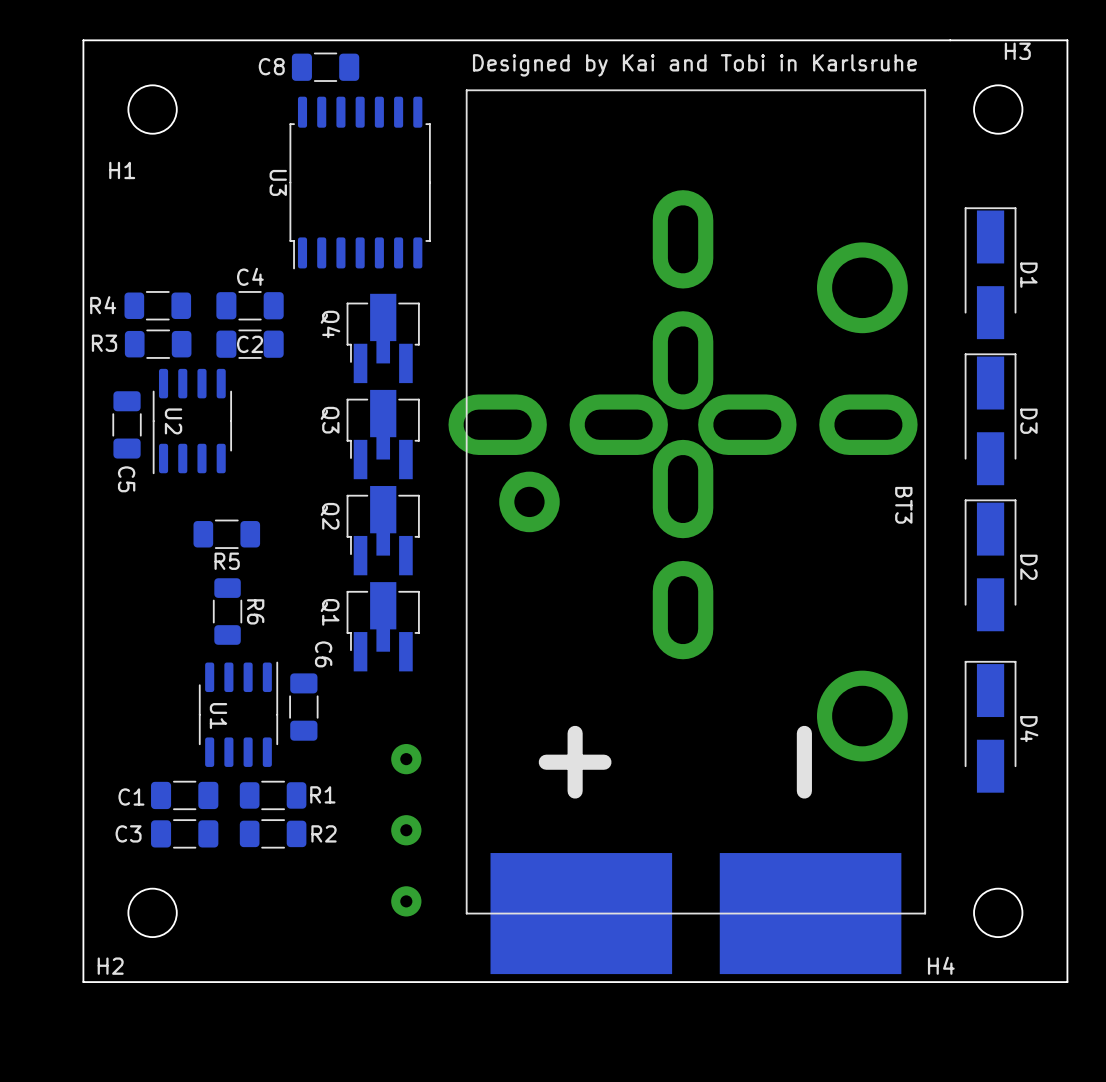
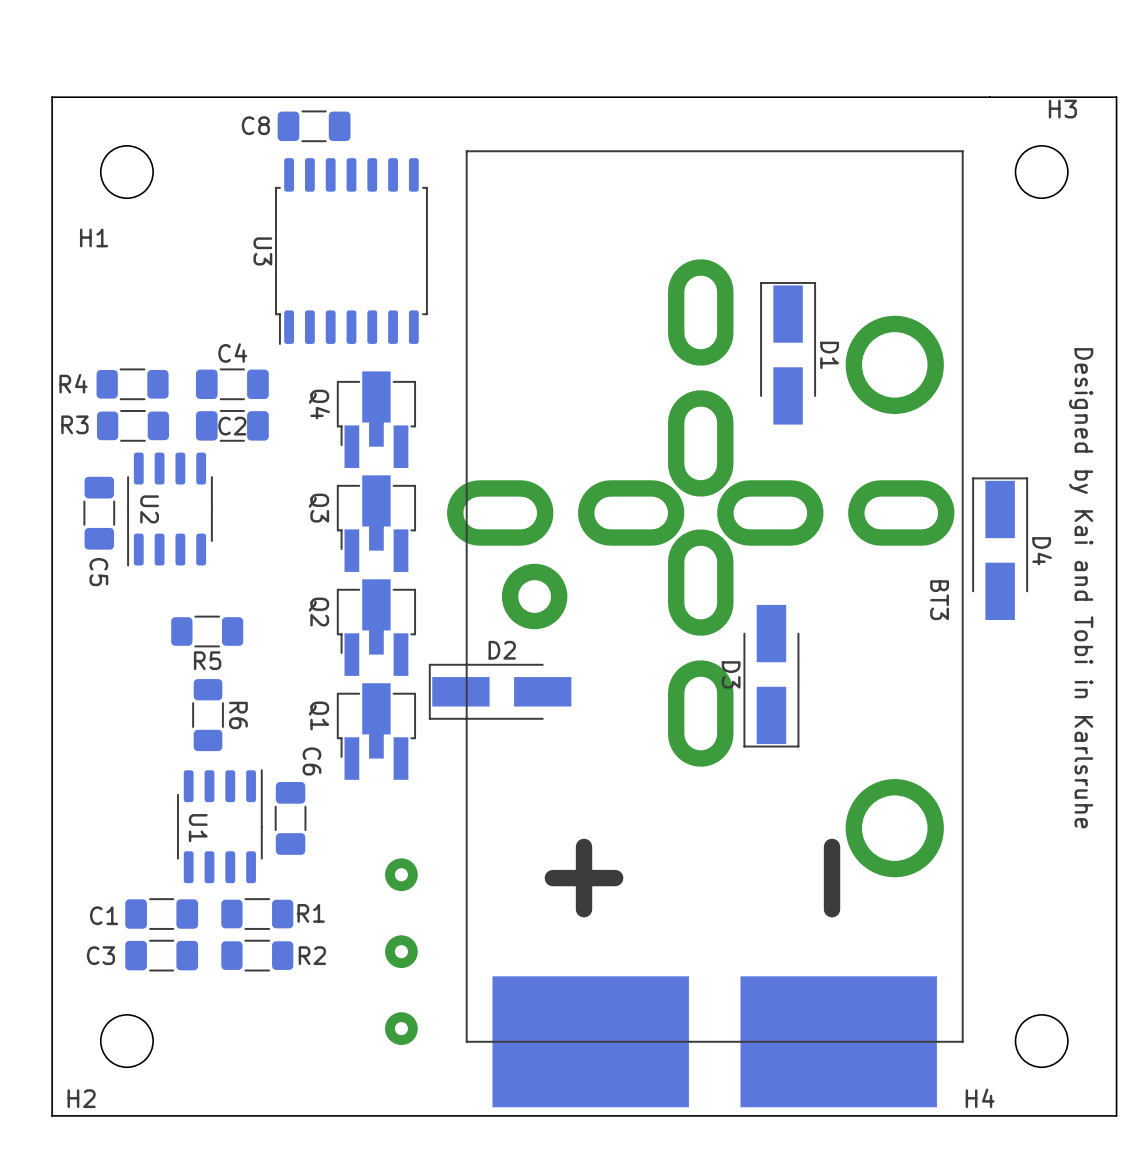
text: Designed by Kai and Tobi in Karlsruhe (694, 65) -> none
D1 position: (990, 273) -> (788, 353)
D3 rotation: 0° (990, 419) -> 180° (771, 676)
D3 position: (990, 419) -> (771, 676)
text: none -> Designed by Kai and Tobi in Karlsruhe (1081, 588)
D2 rotation: 0° (990, 565) -> 90° counterclockwise (500, 691)
D2 position: (990, 565) -> (500, 691)
D4 position: (990, 726) -> (1000, 548)

